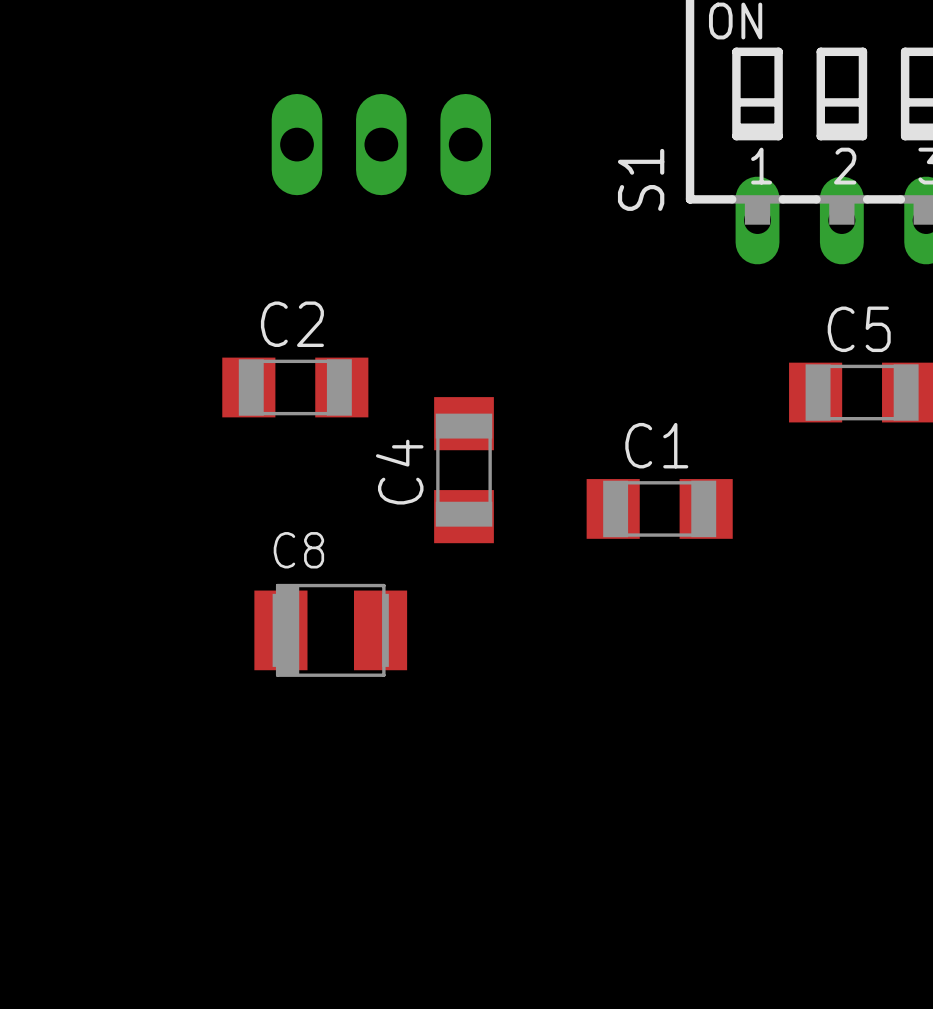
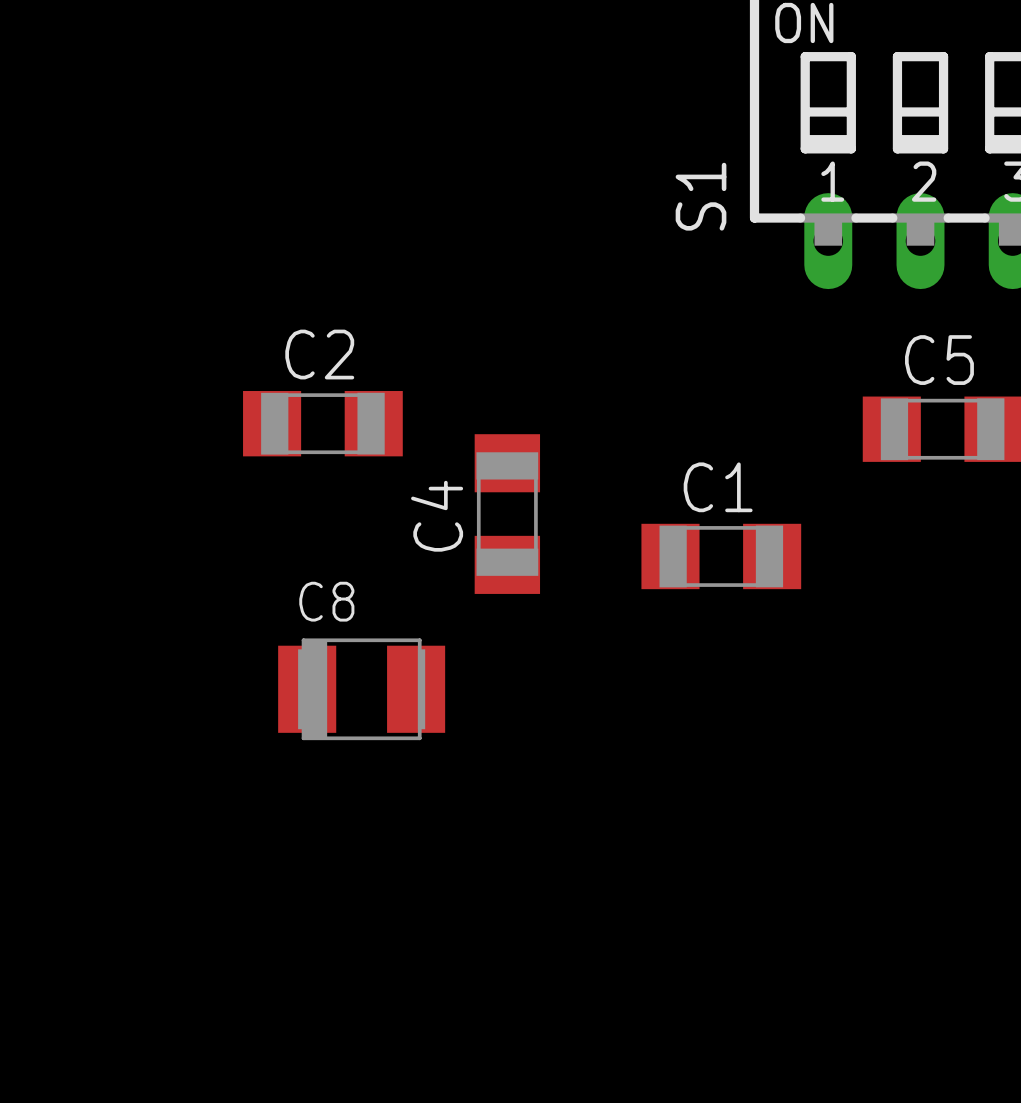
part: (381, 144) -> none

